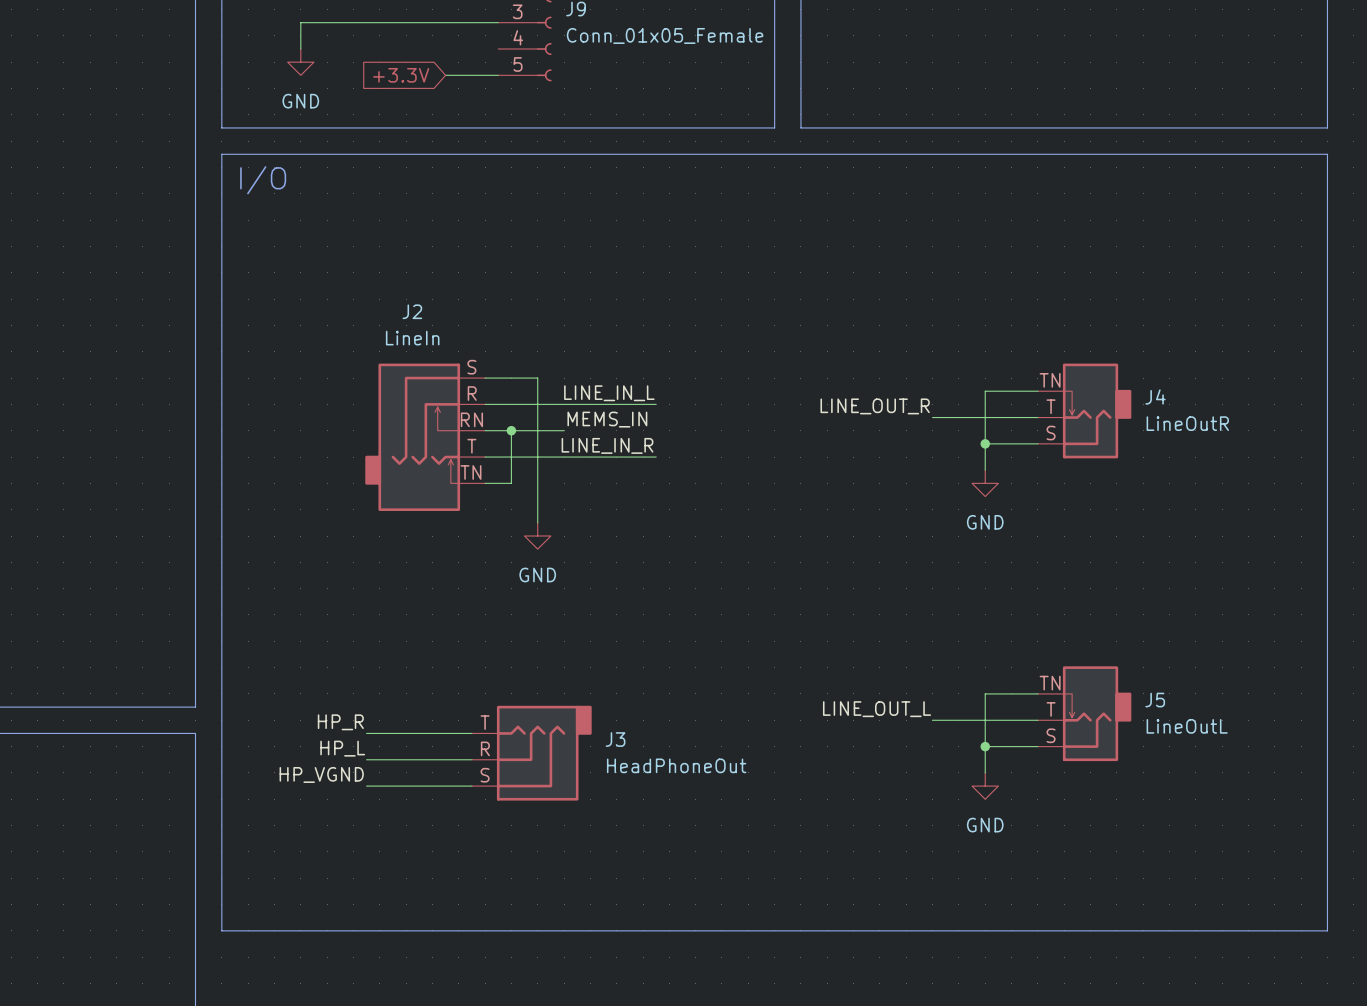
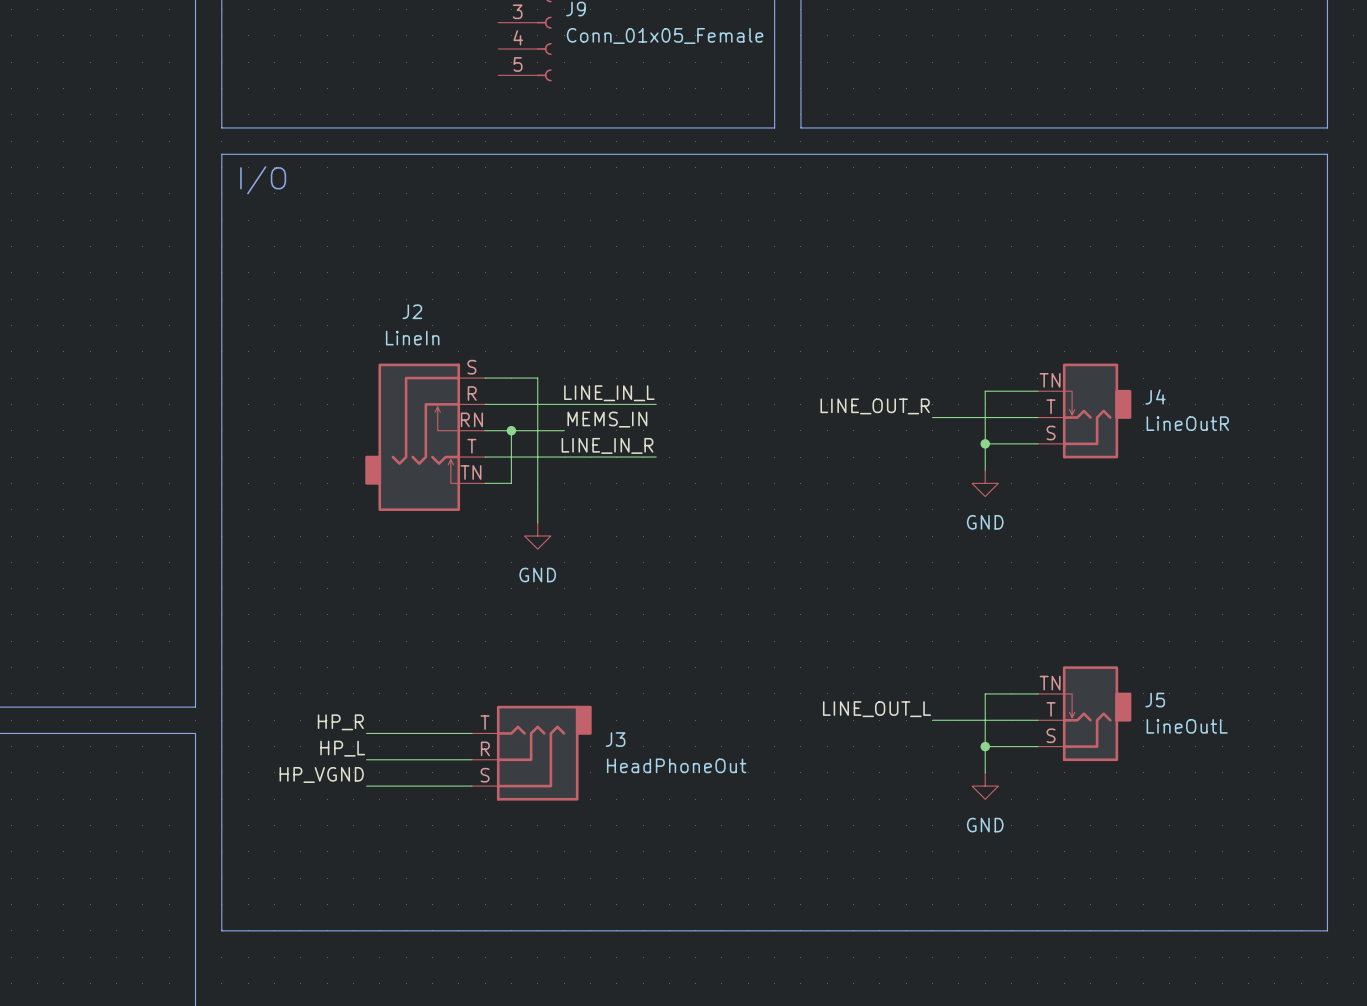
wire: (498, 22) (300, 22) (300, 49) -> none
power symbol: GND (300, 62) -> none
global label: +3.3V (401, 75) -> none
wire: (445, 75) (498, 75) -> none

